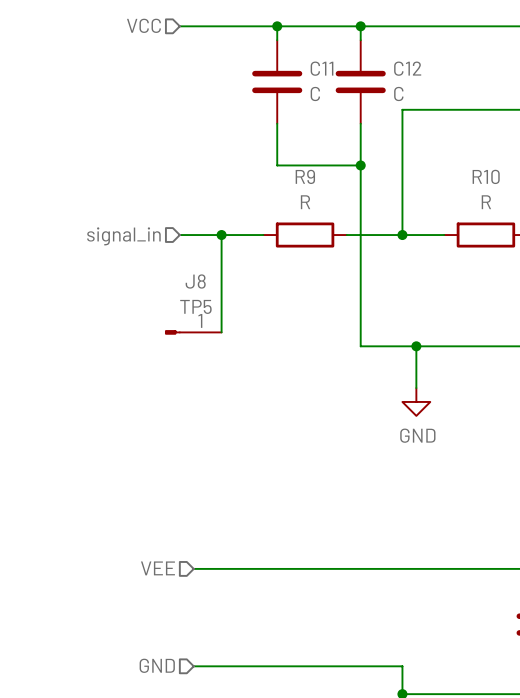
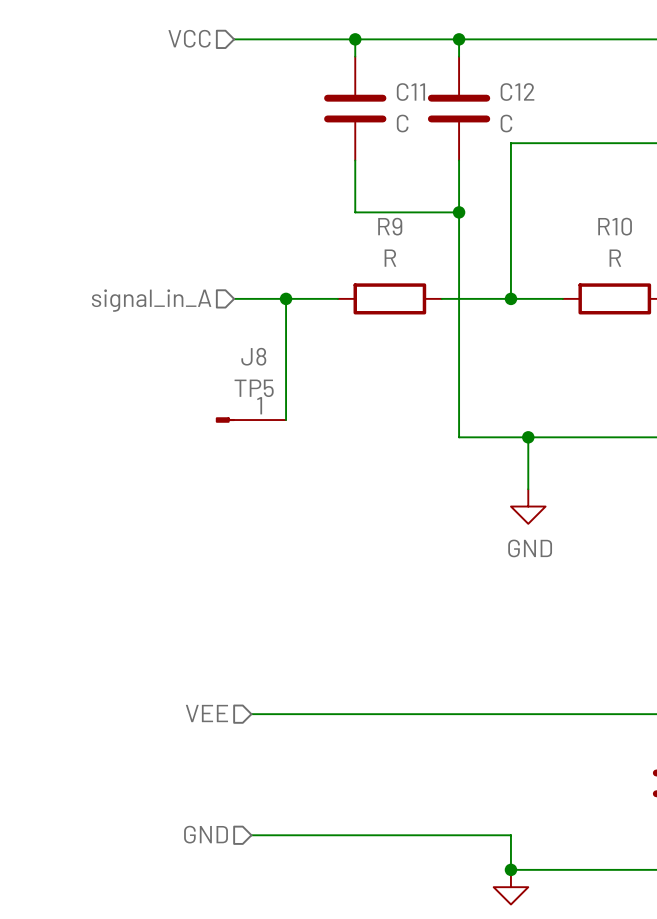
hierarchical label: signal_in (123, 236) -> signal_in_A (151, 300)

